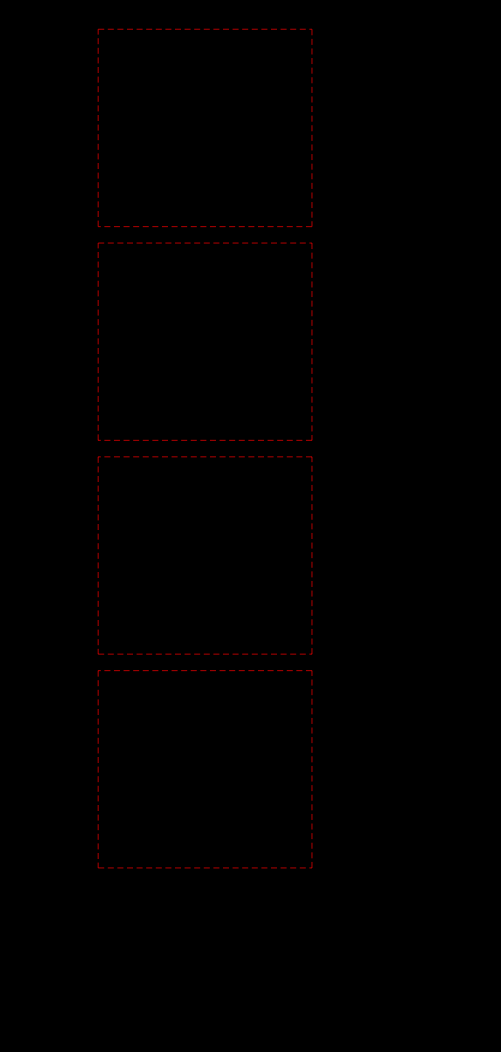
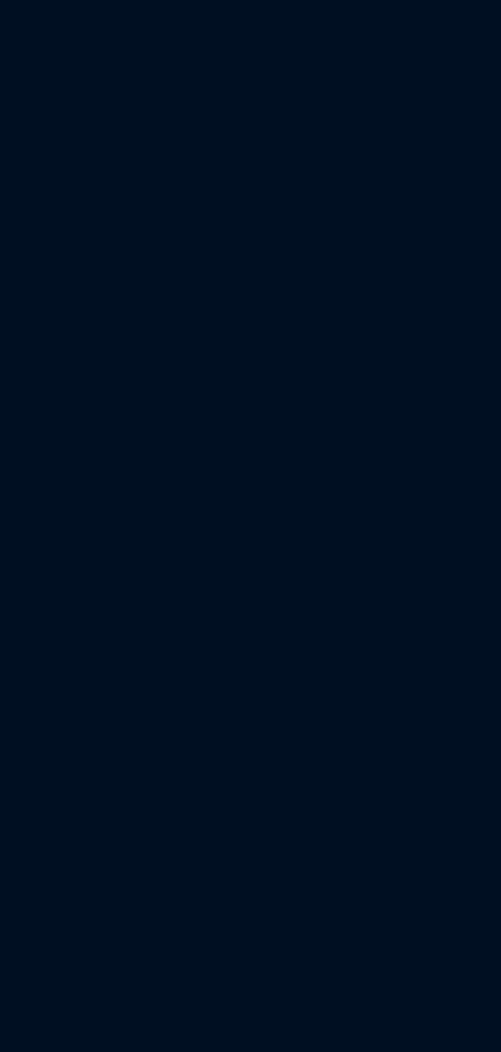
zone outline: (98, 29) (98, 226) (311, 226) (311, 29) (98, 29) -> none
zone outline: (98, 243) (98, 440) (311, 440) (311, 243) (98, 243) -> none
zone outline: (98, 456) (98, 654) (311, 654) (311, 456) (98, 456) -> none
zone outline: (98, 670) (311, 670) (311, 867) (98, 867) (98, 670) -> none

